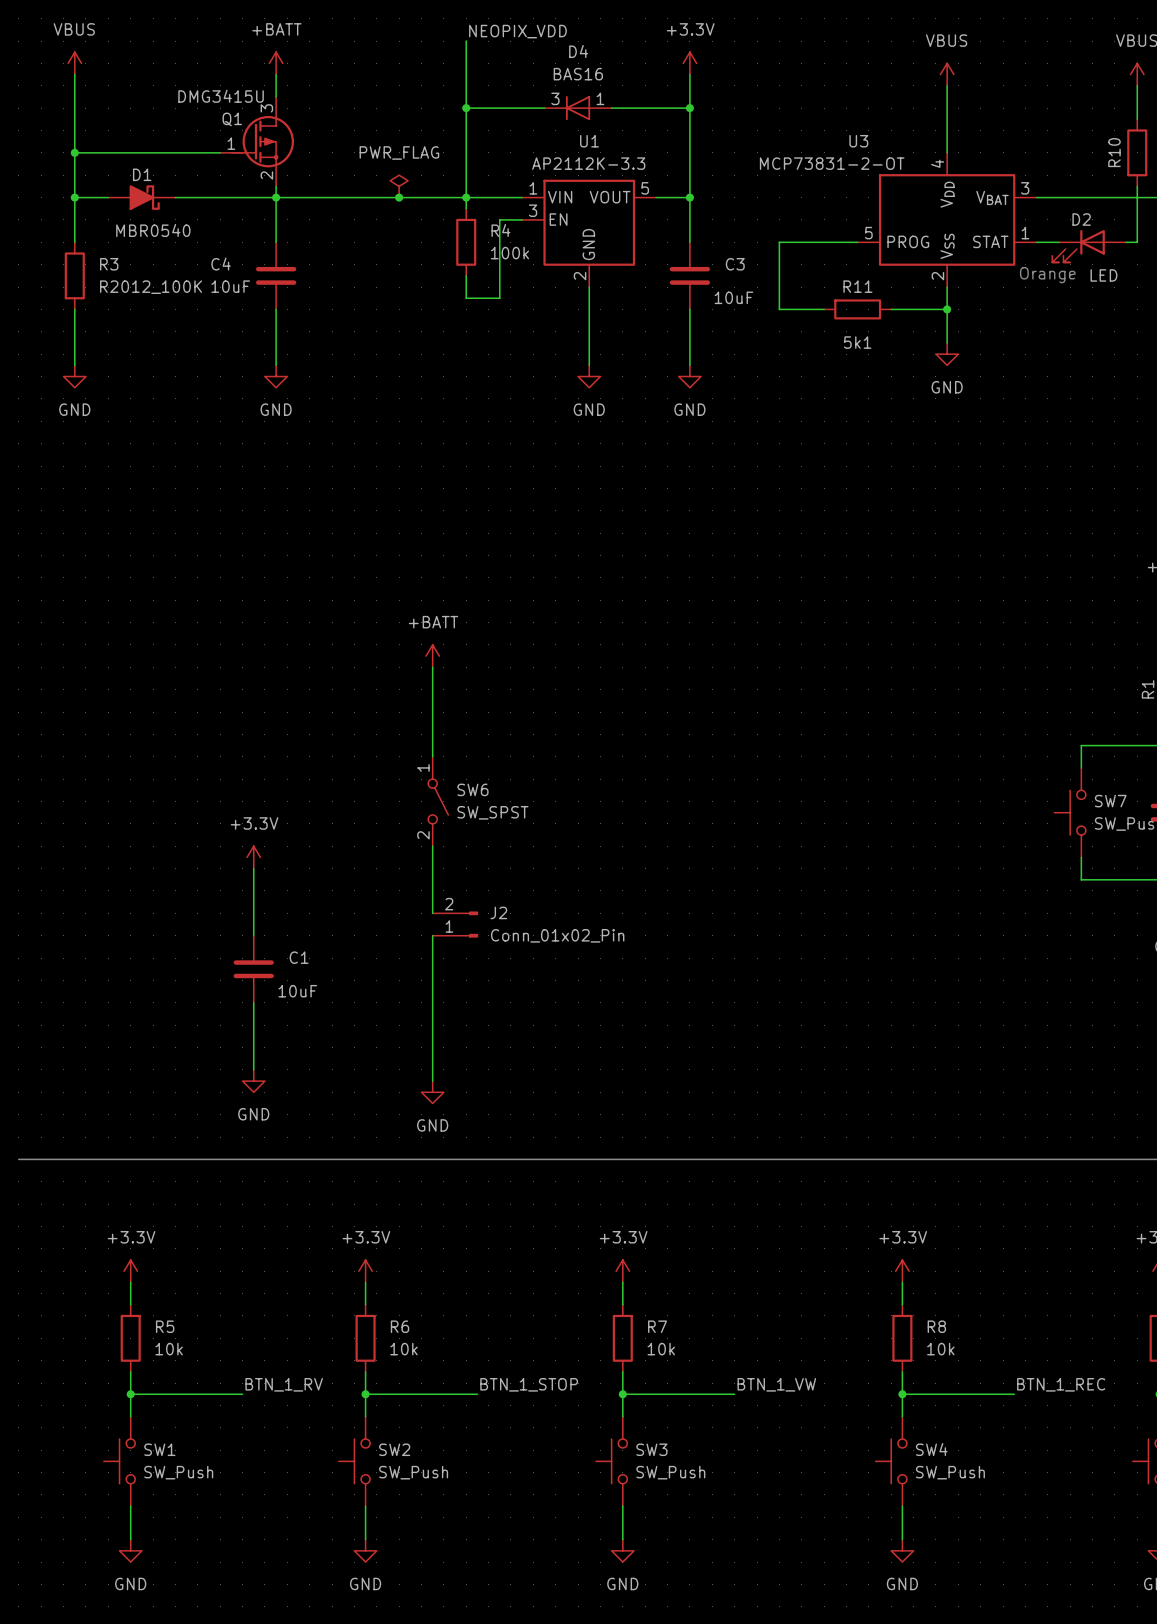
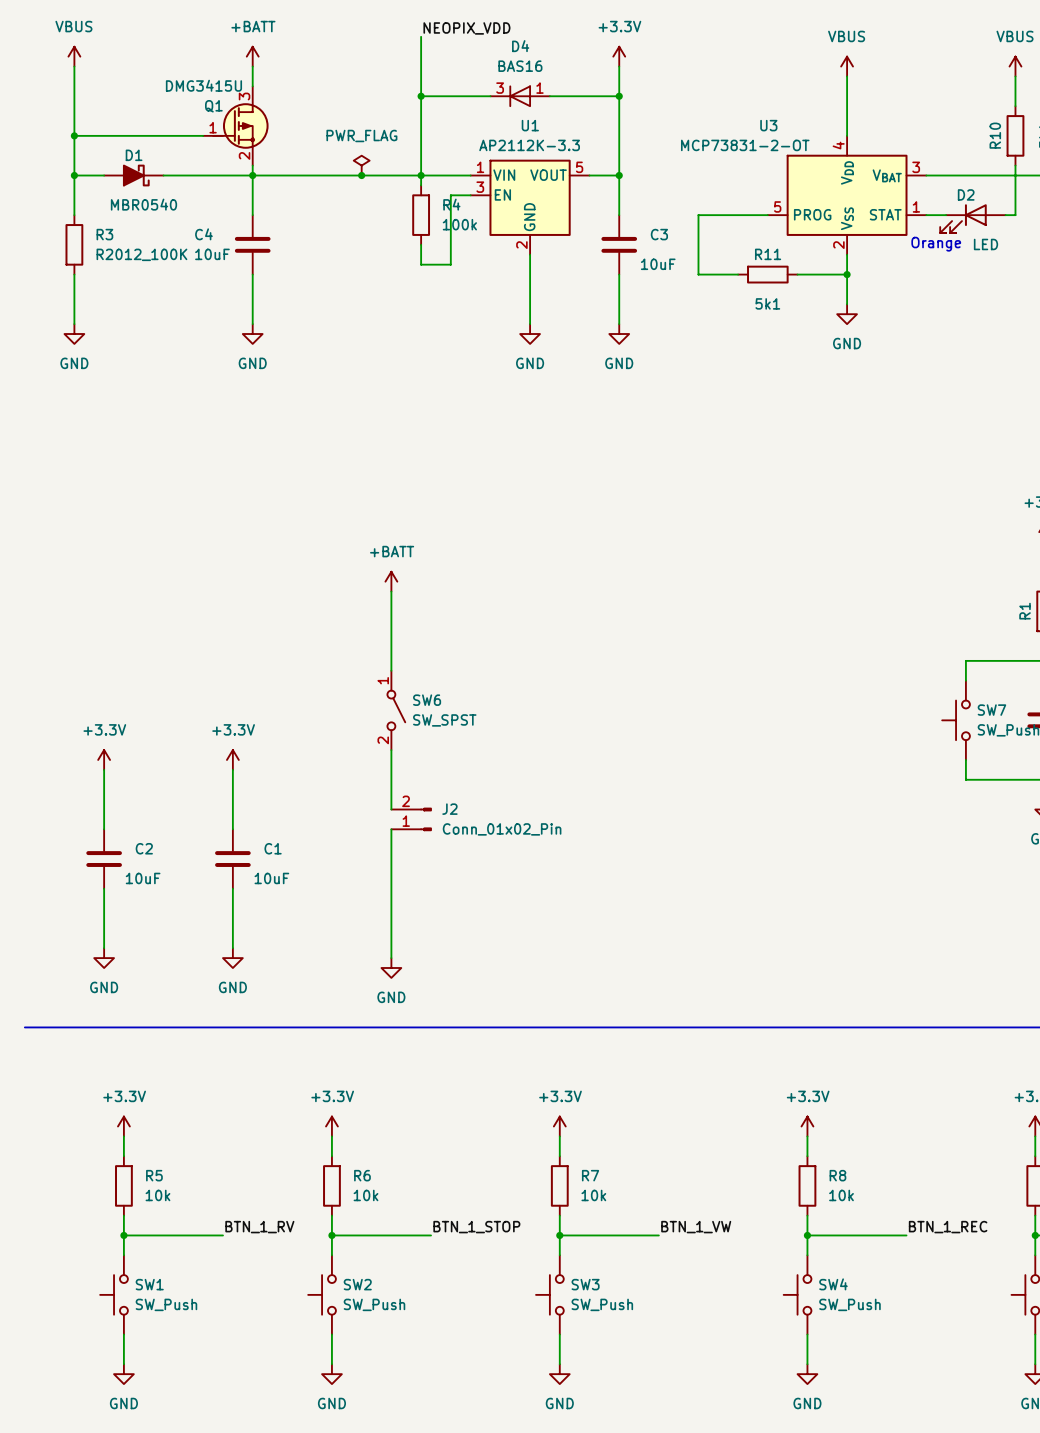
power symbol: none -> +3.3V (104, 759)
wire: none -> (104, 769) (104, 829)
C2: none -> 10uF (104, 859)
wire: none -> (104, 888) (104, 948)
power symbol: none -> GND (104, 958)

